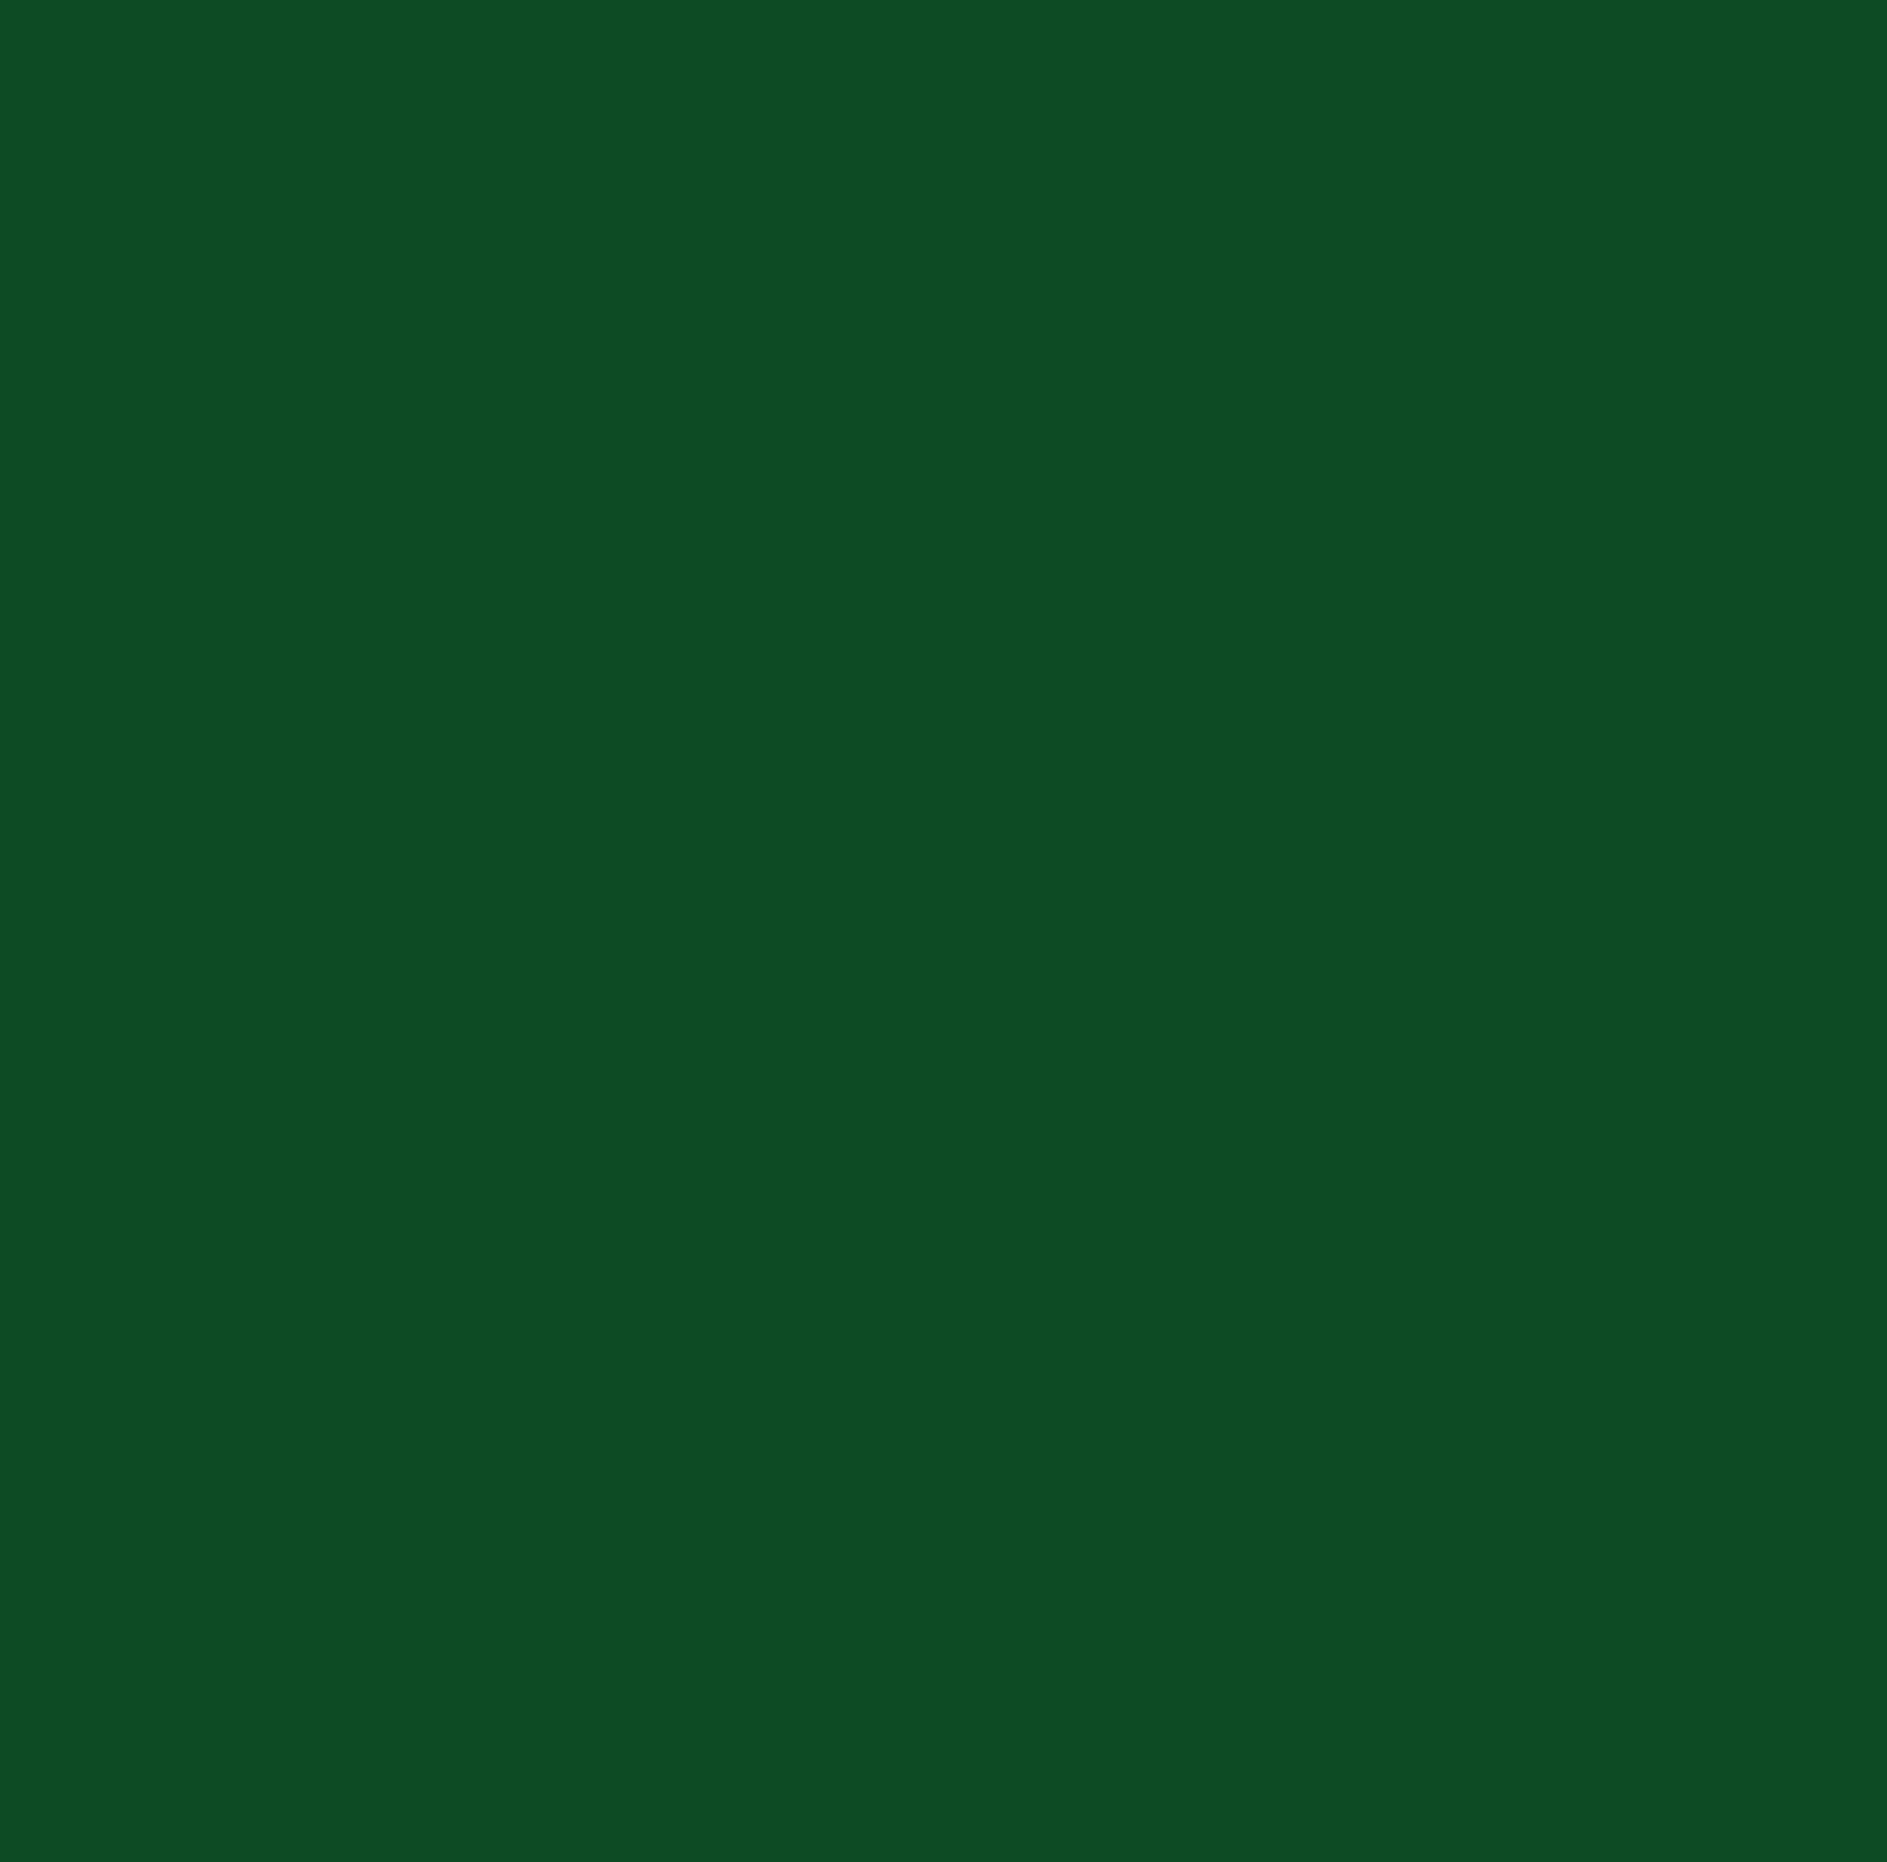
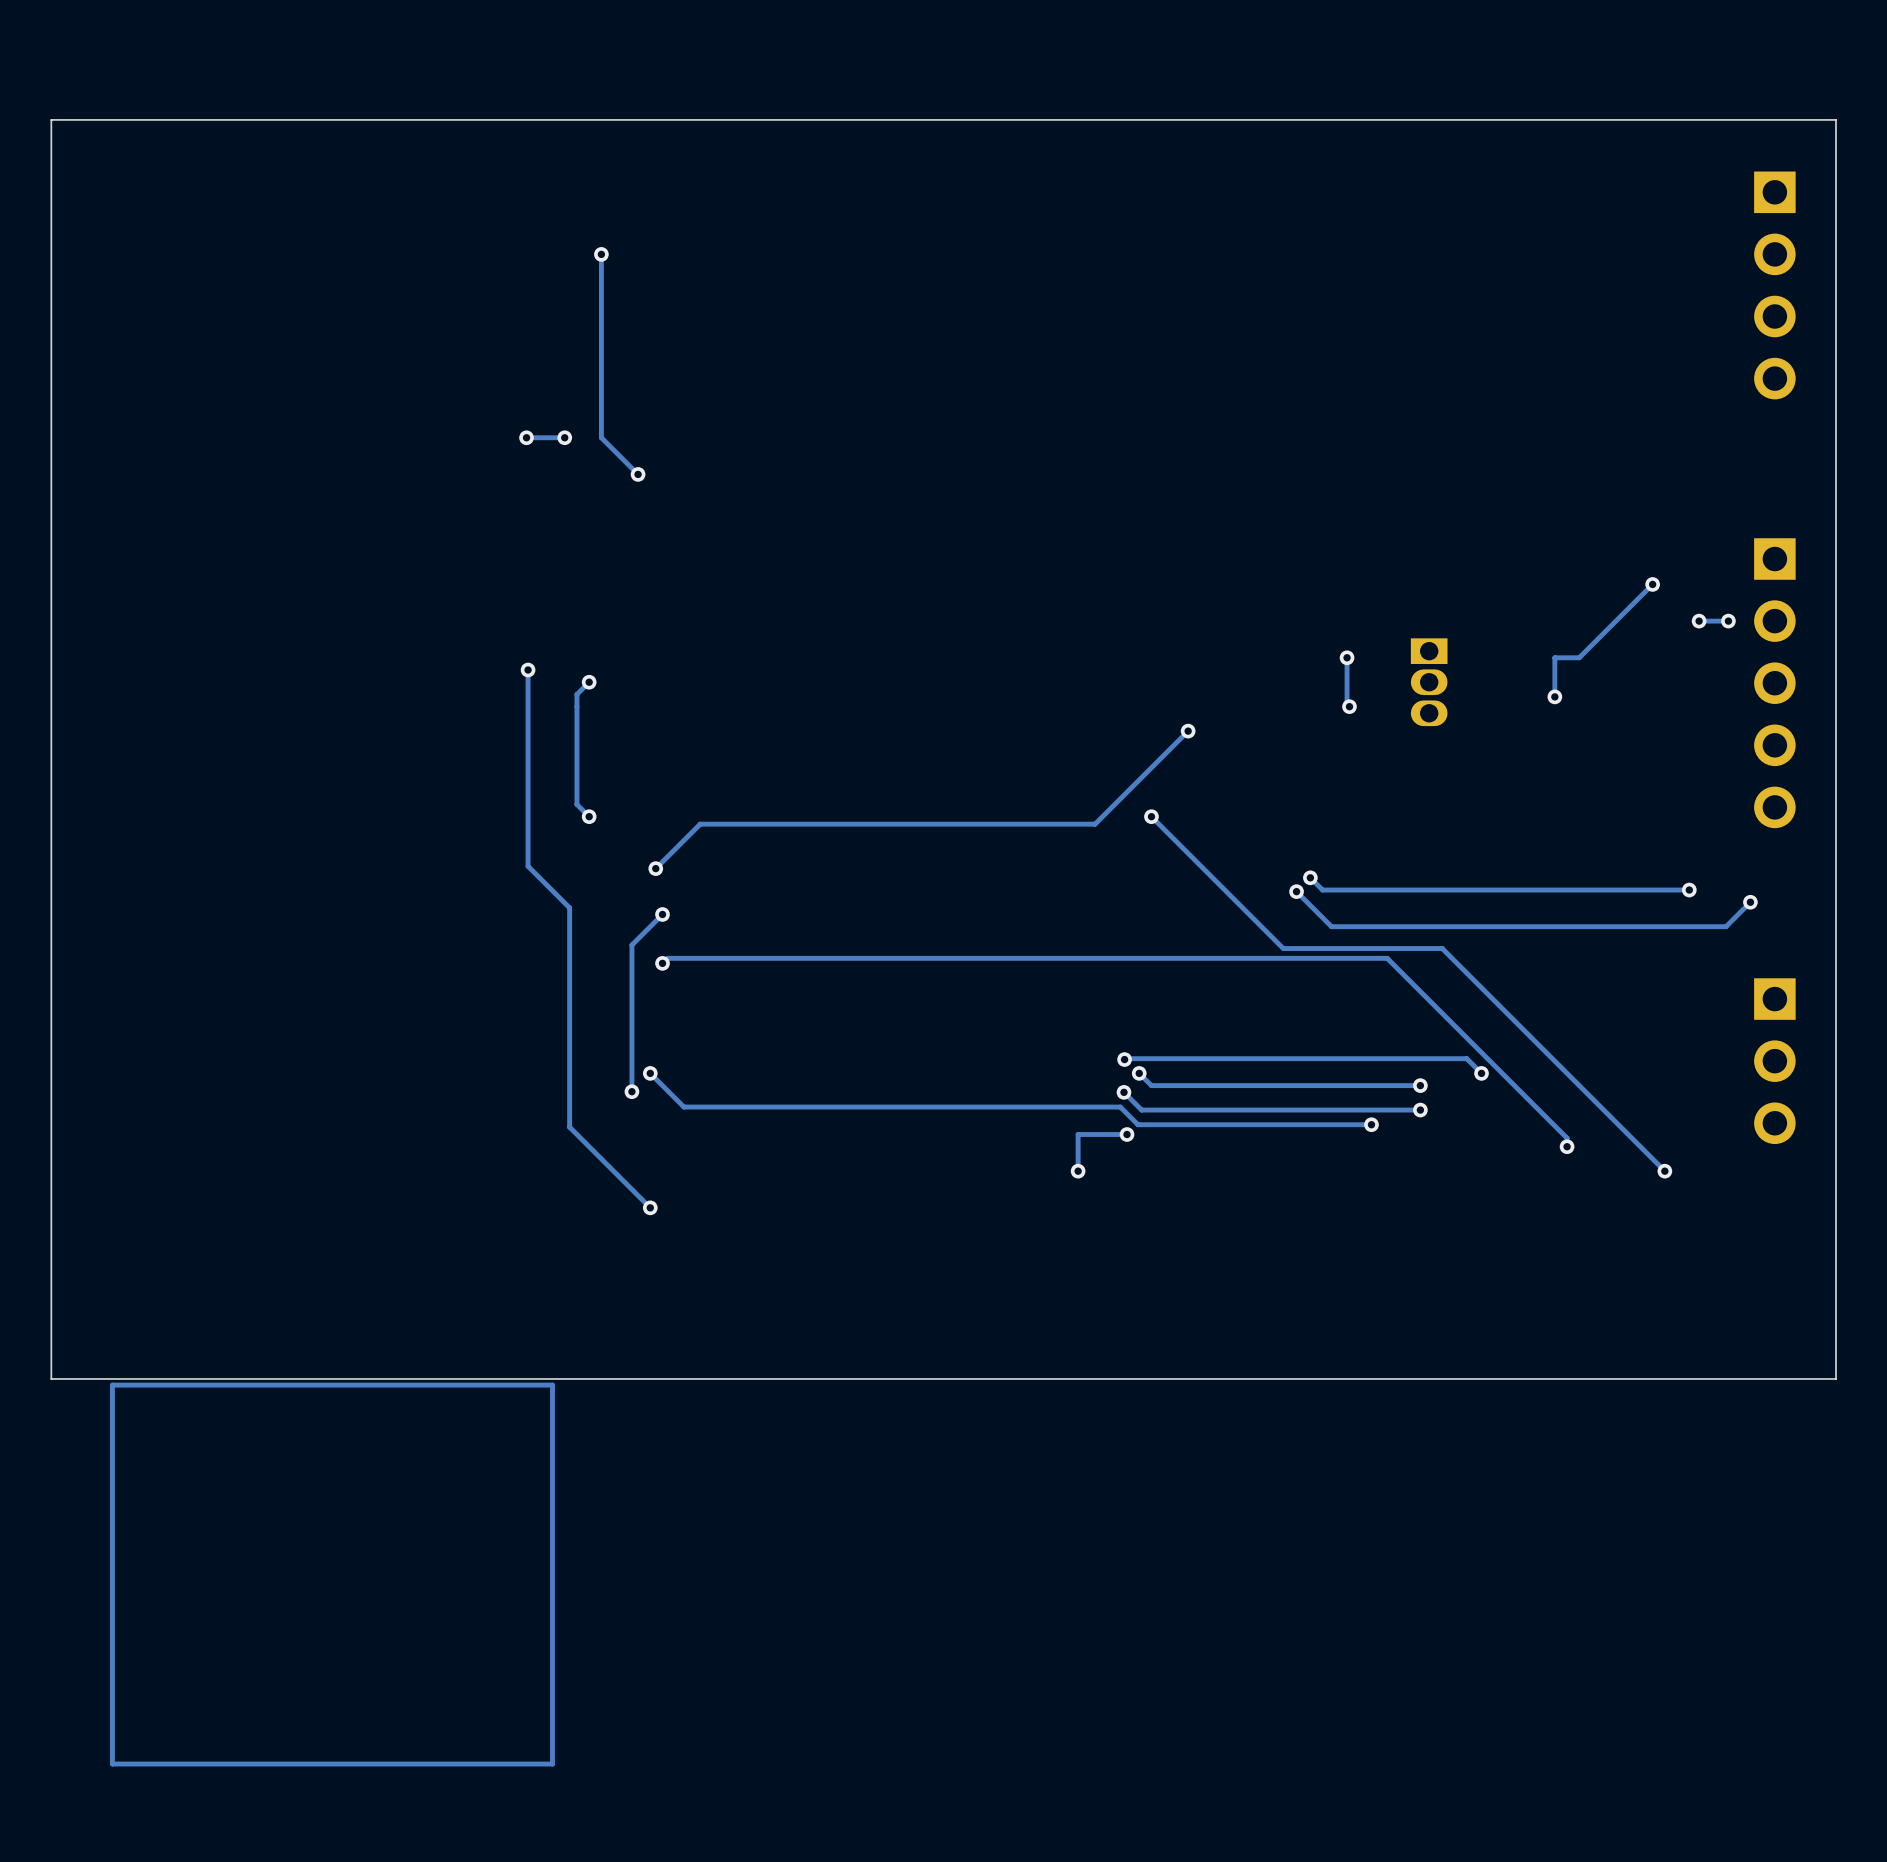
board edge: none -> (1836, 119) (51, 119) (51, 1378) (1836, 1378) (1836, 119)
track: none -> (601, 254) (601, 437) (638, 474)
via: none -> (601, 254)
part: none -> (1774, 285)
via: none -> (526, 437)
track: none -> (564, 437) (526, 437)
via: none -> (564, 437)
via: none -> (638, 474)
track: none -> (1652, 584) (1579, 657) (1554, 657) (1554, 696)
via: none -> (1652, 584)
via: none -> (1699, 621)
track: none -> (1728, 621) (1699, 621)
via: none -> (1728, 621)
track: none -> (1347, 657) (1347, 704) (1349, 706)
via: none -> (1347, 657)
track: none -> (528, 670) (528, 866) (569, 907) (569, 1127) (650, 1207)
via: none -> (528, 670)
track: none -> (589, 682) (576, 694) (576, 804) (589, 816)
via: none -> (589, 682)
part: none -> (1429, 682)
part: none -> (1774, 683)
via: none -> (1554, 696)
via: none -> (1349, 706)
track: none -> (1188, 731) (1095, 824) (700, 824) (655, 868)
via: none -> (1188, 731)
via: none -> (589, 816)
track: none -> (1151, 816) (1283, 948) (1442, 948) (1664, 1171)
via: none -> (1151, 816)
via: none -> (655, 868)
track: none -> (1310, 877) (1322, 890) (1689, 890)
via: none -> (1310, 877)
via: none -> (1689, 890)
track: none -> (1296, 891) (1331, 926) (1725, 926) (1750, 902)
via: none -> (1296, 891)
via: none -> (1750, 902)
track: none -> (662, 914) (631, 945) (631, 1091)
via: none -> (662, 914)
track: none -> (662, 963) (667, 958) (1387, 958) (1567, 1138) (1567, 1146)
via: none -> (662, 963)
track: none -> (1124, 1059) (1466, 1058) (1481, 1073)
via: none -> (1124, 1059)
part: none -> (1774, 1061)
track: none -> (650, 1073) (683, 1107) (1120, 1107) (1138, 1124) (1371, 1124)
via: none -> (650, 1073)
track: none -> (1139, 1073) (1151, 1085) (1420, 1085)
via: none -> (1139, 1073)
via: none -> (1481, 1073)
via: none -> (1420, 1085)
via: none -> (631, 1091)
track: none -> (1123, 1092) (1141, 1110) (1420, 1110)
via: none -> (1123, 1092)
via: none -> (1420, 1110)
via: none -> (1371, 1124)
track: none -> (1127, 1134) (1078, 1134) (1078, 1171)
via: none -> (1127, 1134)
via: none -> (1567, 1146)
via: none -> (1078, 1171)
via: none -> (1664, 1171)
via: none -> (650, 1207)
track: none -> (552, 1385) (112, 1385) (112, 1764) (552, 1764) (552, 1385)

